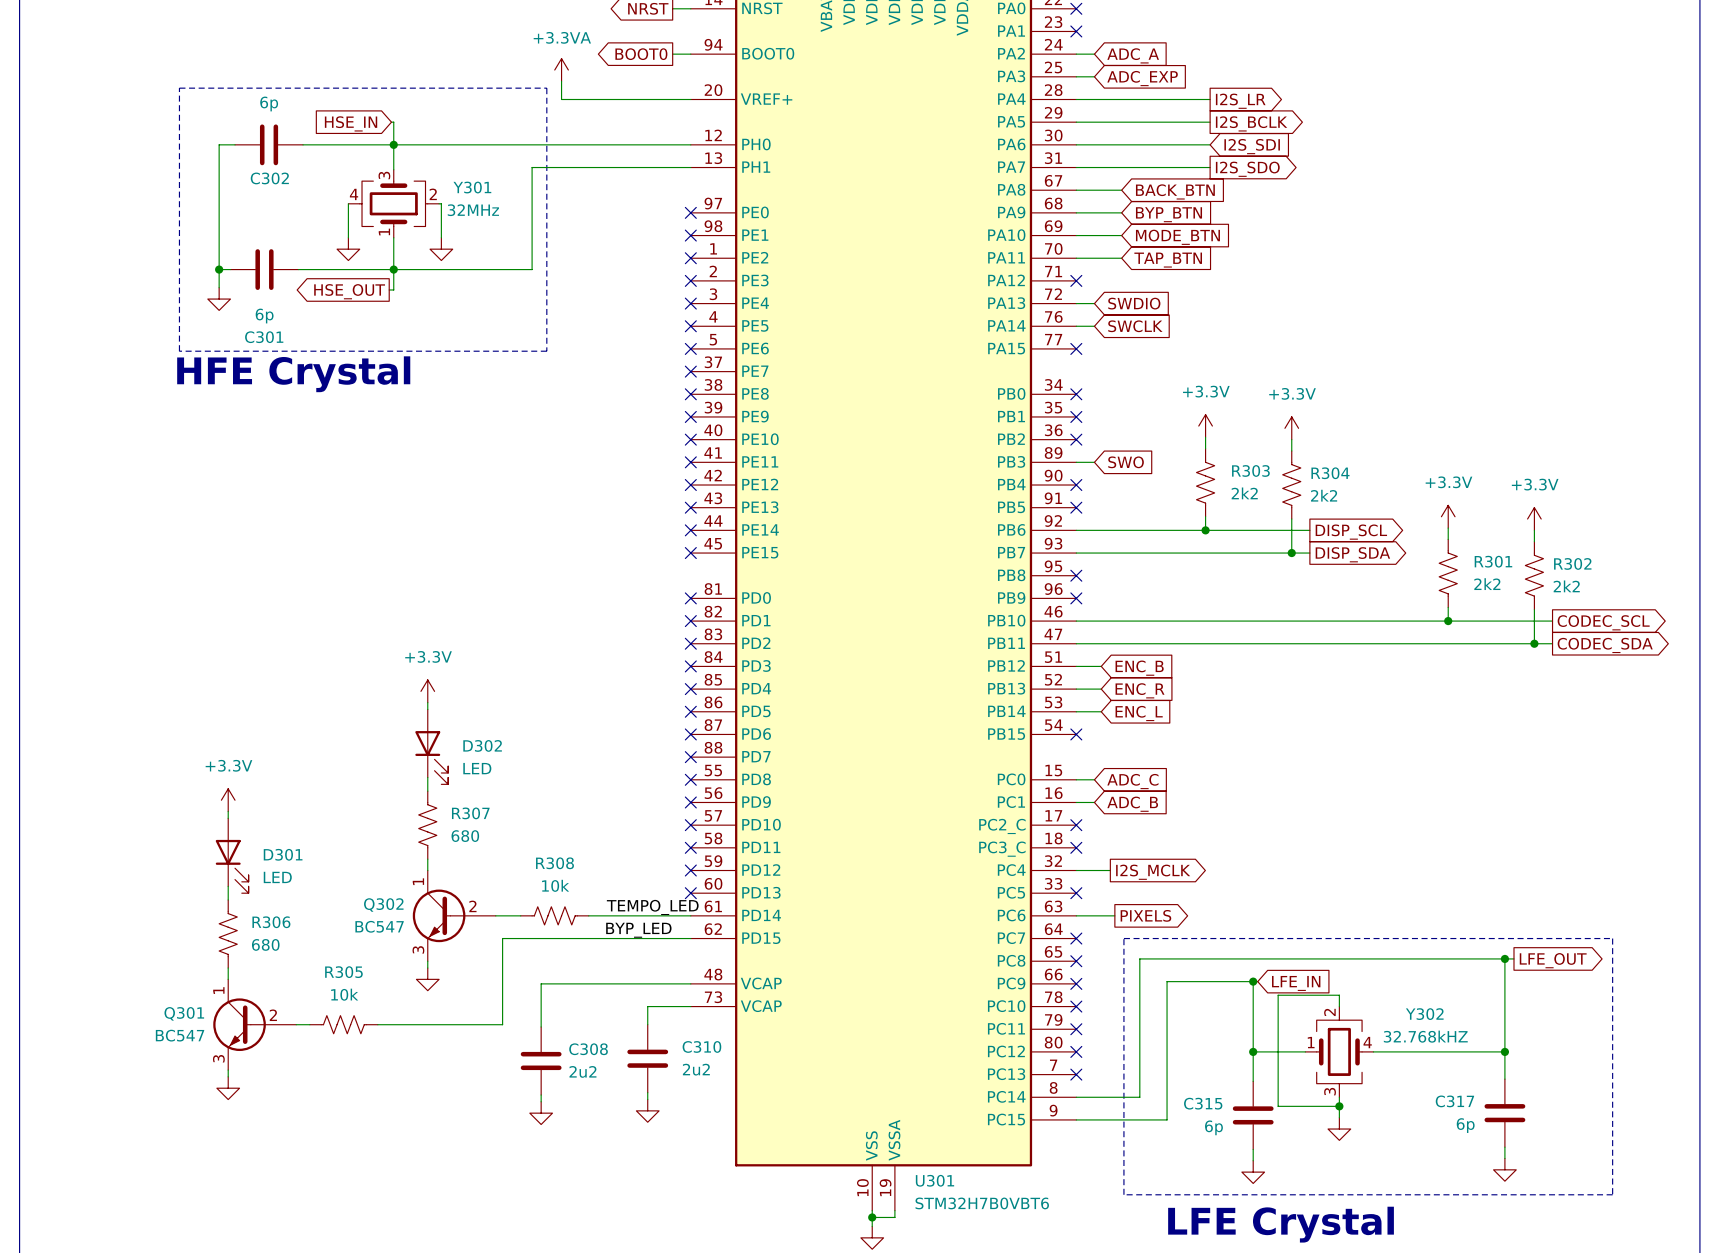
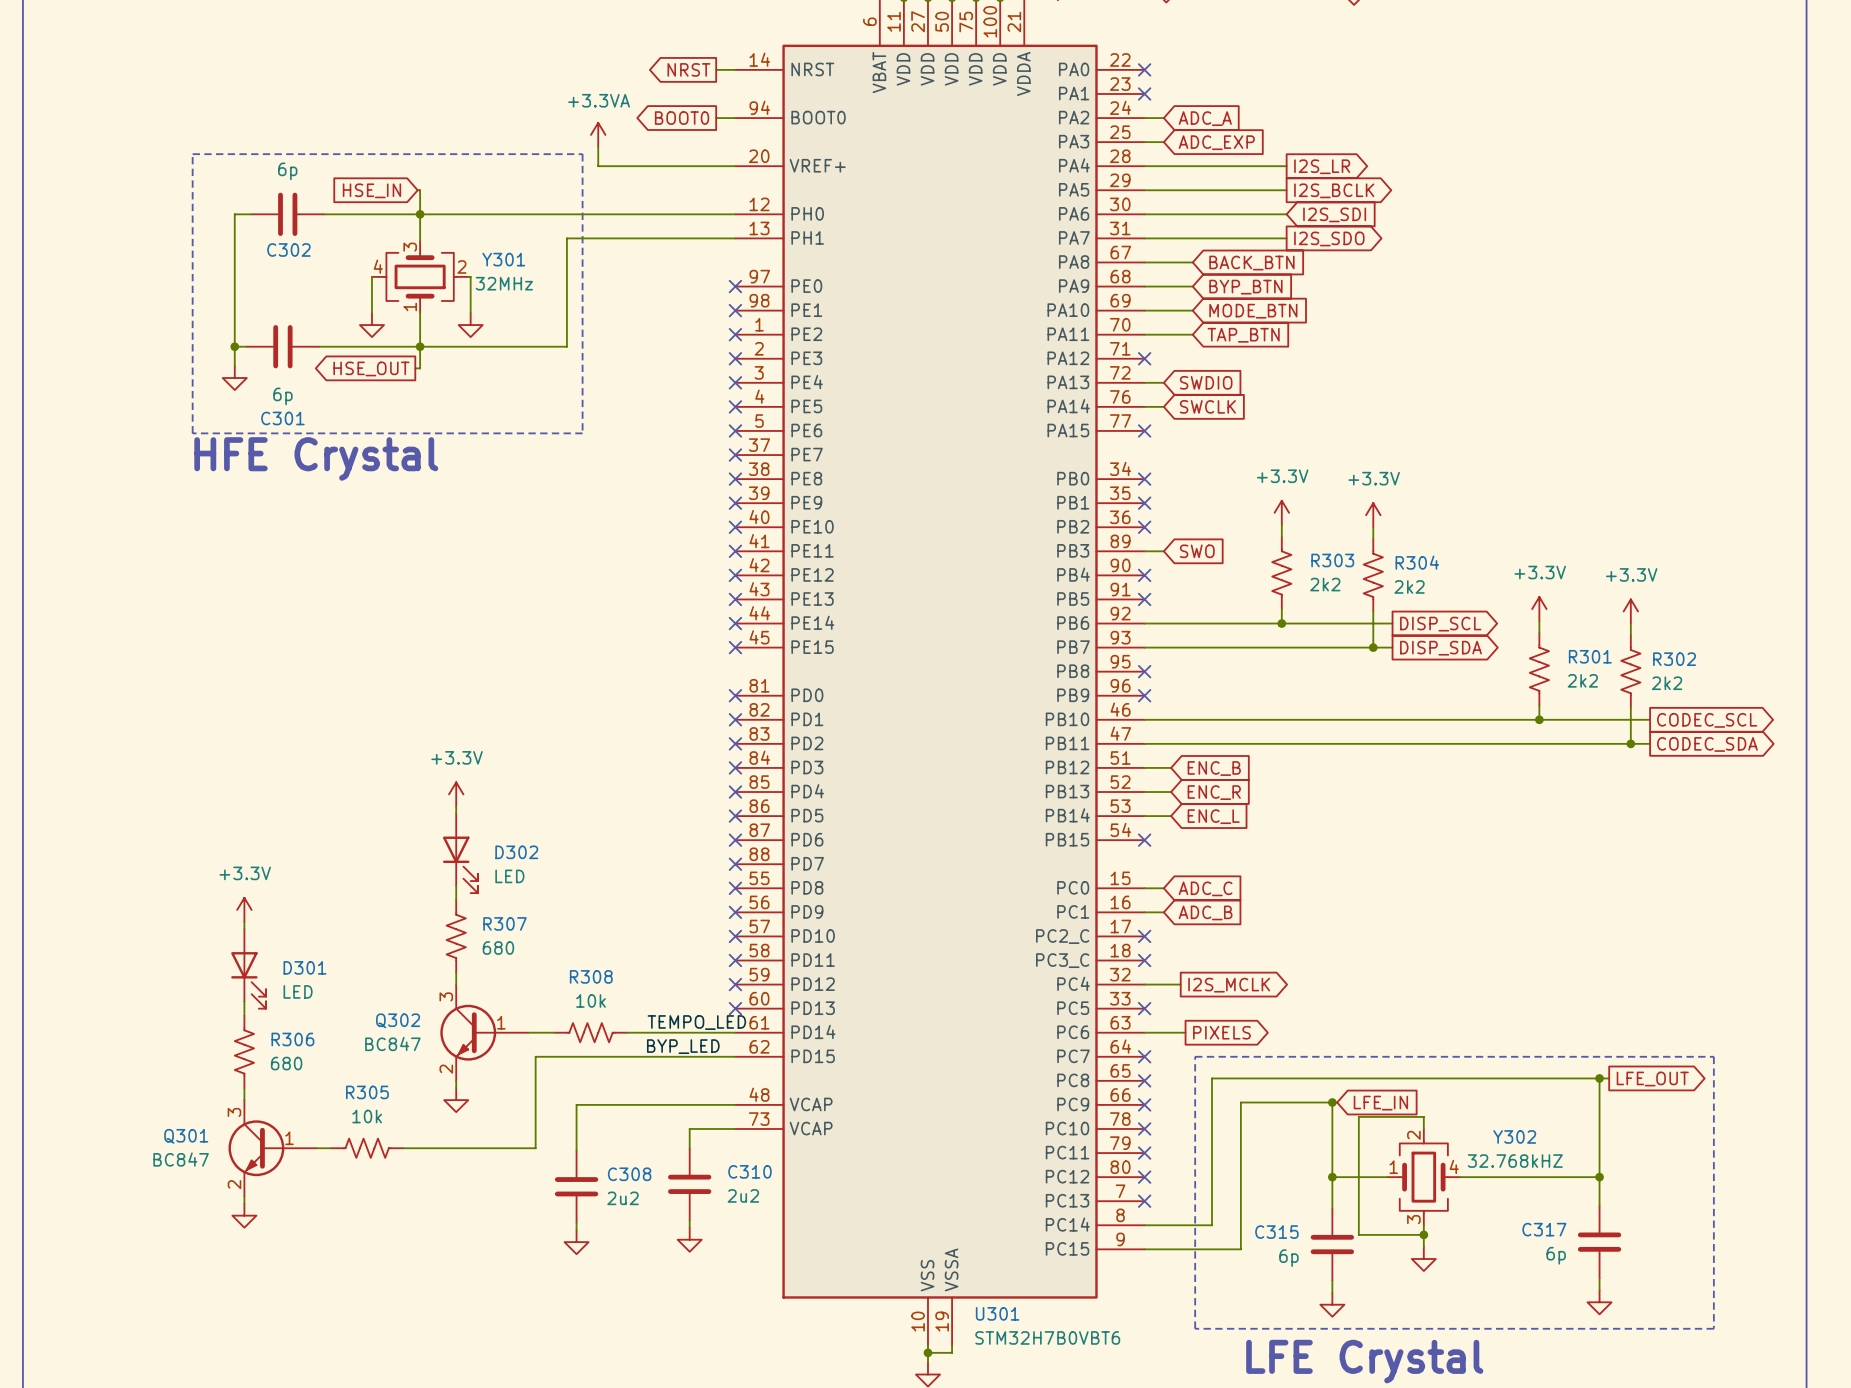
Q302 symbol: [412, 870, 496, 962] -> [440, 984, 529, 1081]
Q302 value: BC547 (379, 926) -> BC847 (392, 1044)
Q301 symbol: [213, 979, 297, 1071] -> [228, 1100, 317, 1197]
Q301 value: BC547 (180, 1035) -> BC847 (181, 1159)

